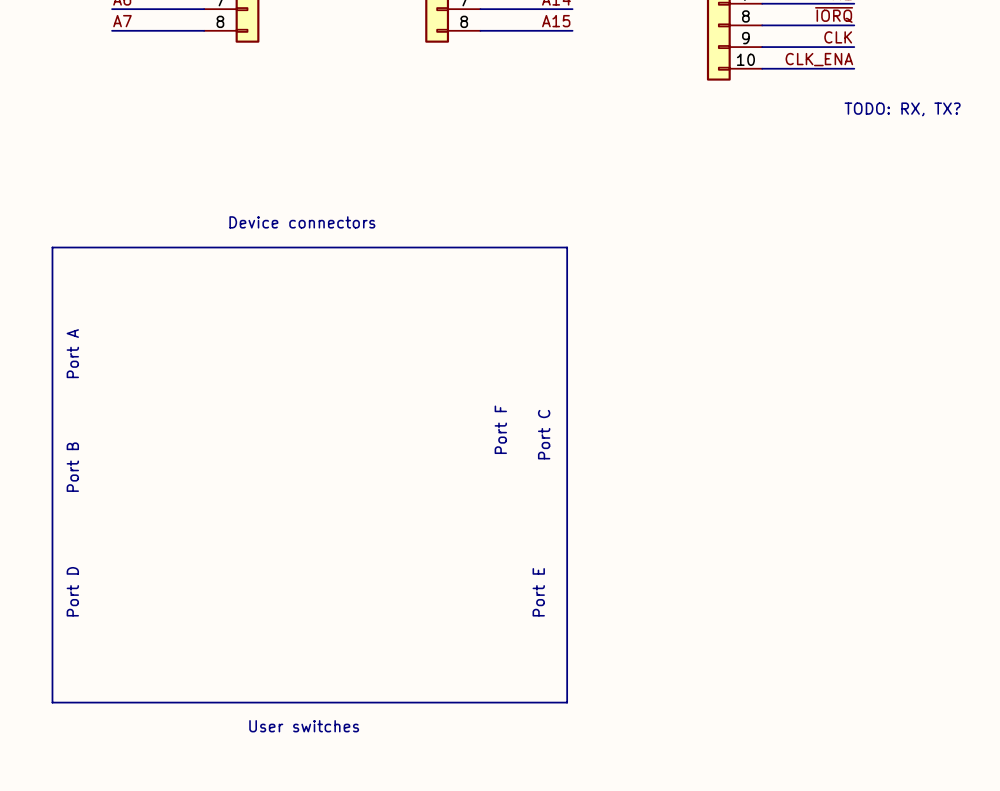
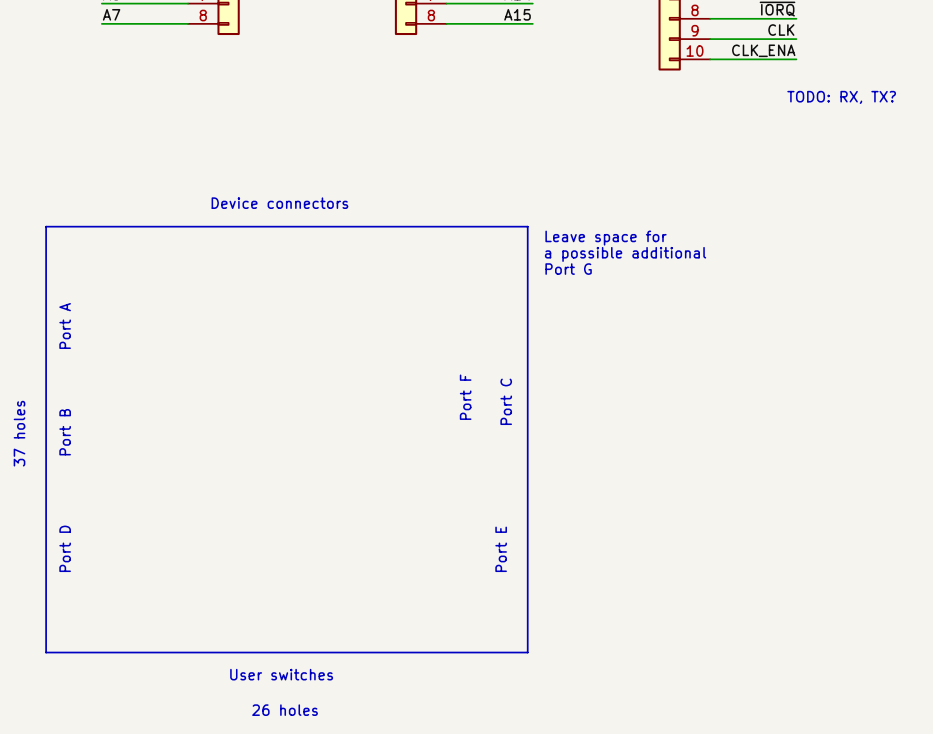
text: none -> Leave space for (606, 238)
text: none -> a possible additional (625, 254)
text: none -> Port G (568, 269)
text: none -> 37 holes (19, 433)
text: none -> 26 holes (285, 710)

